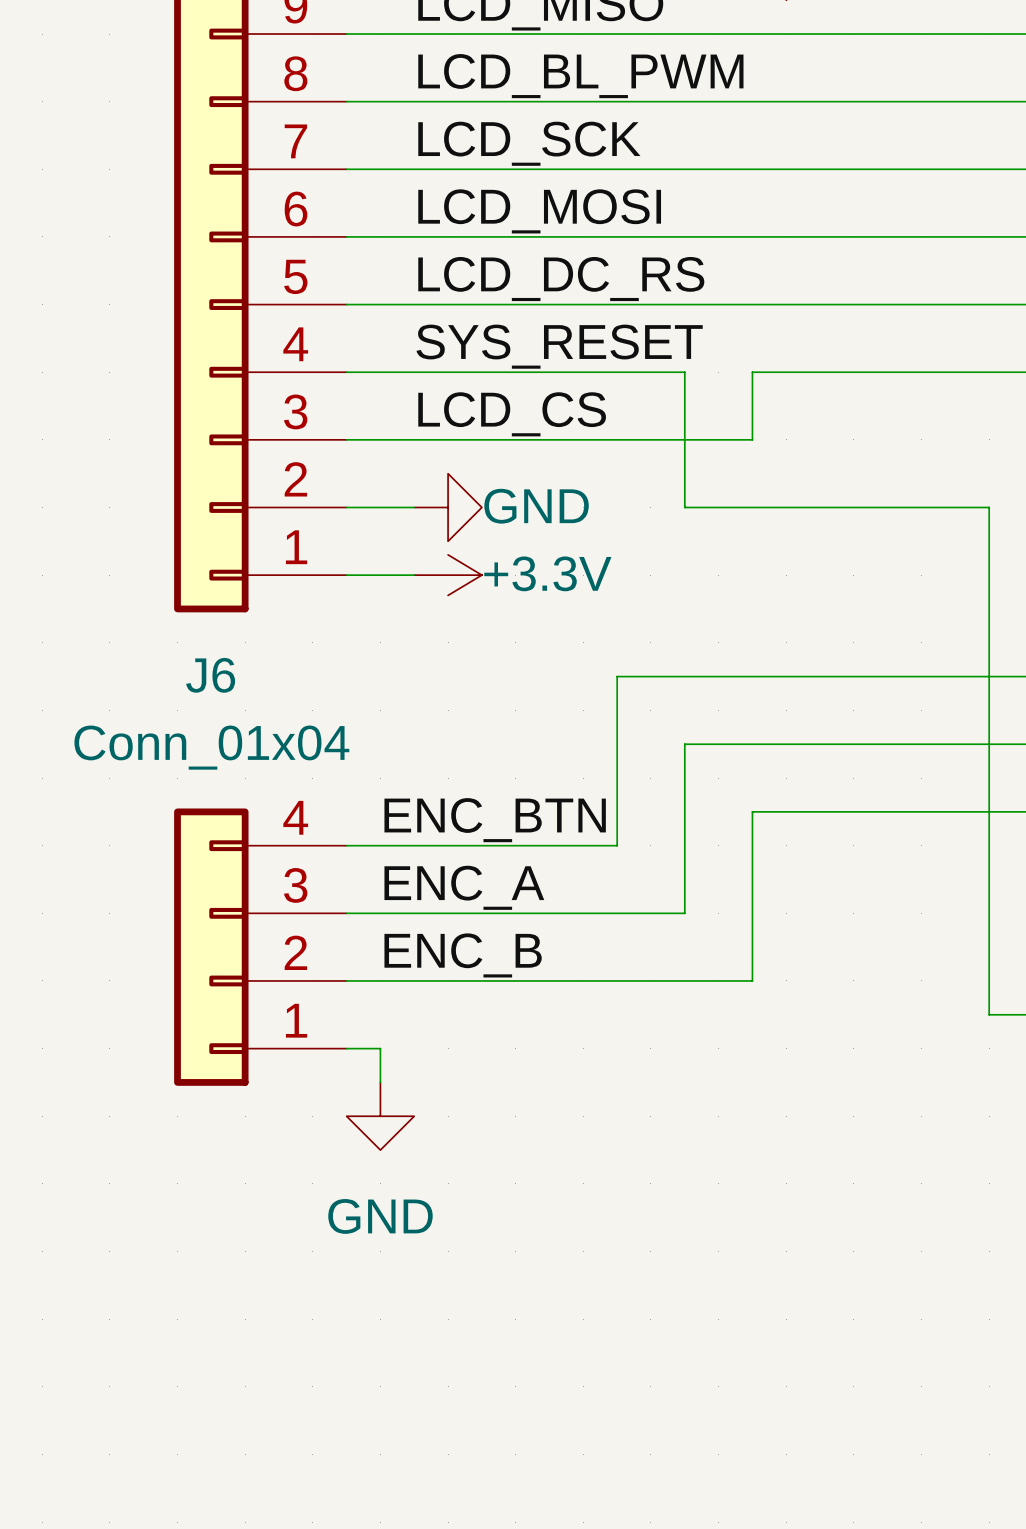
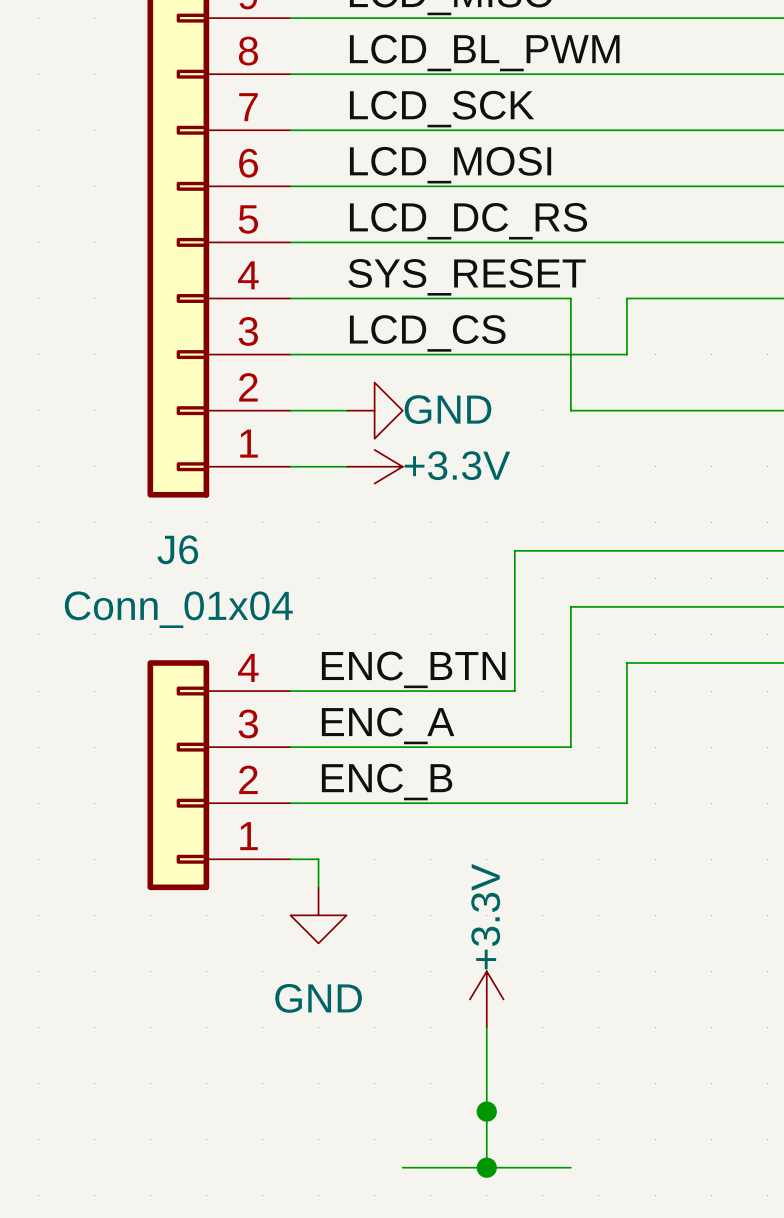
power symbol: none -> +3.3V (486, 999)
wire: none -> (486, 1027) (486, 1167)
junction: none -> (486, 1111)
wire: none -> (402, 1167) (570, 1167)
junction: none -> (486, 1167)

